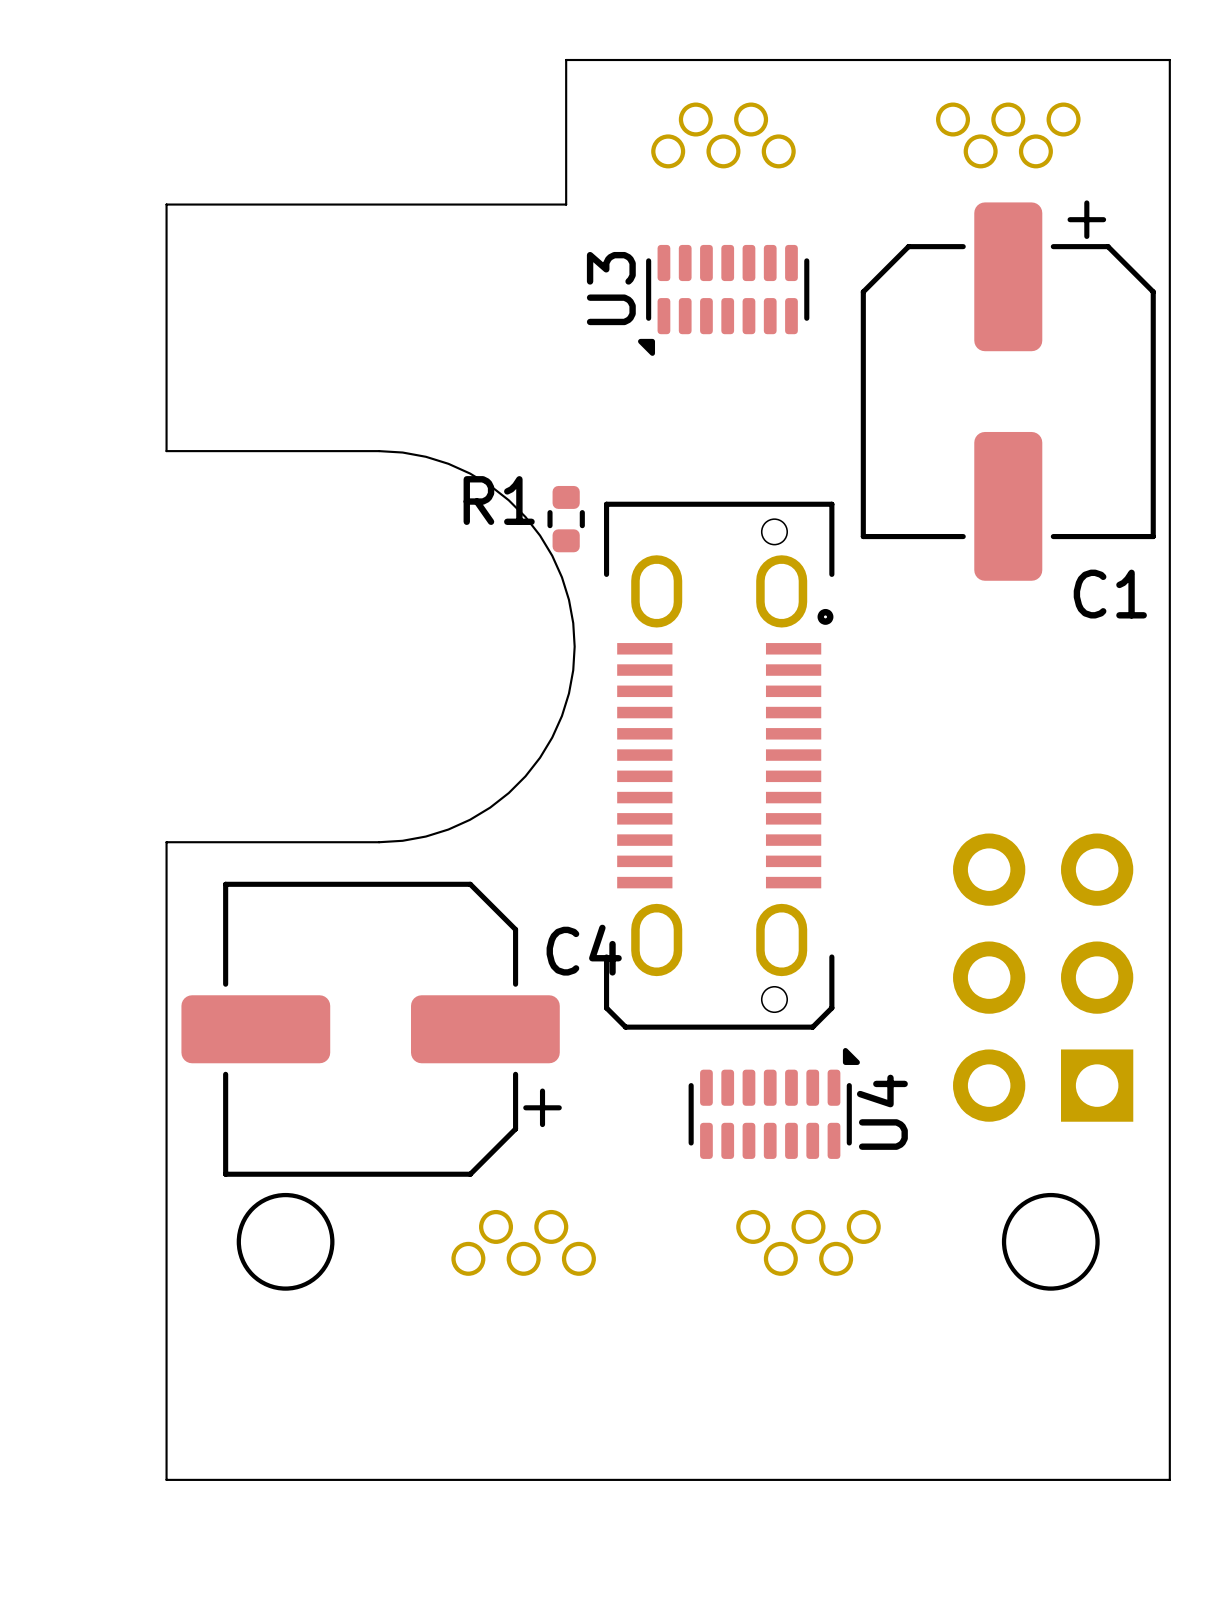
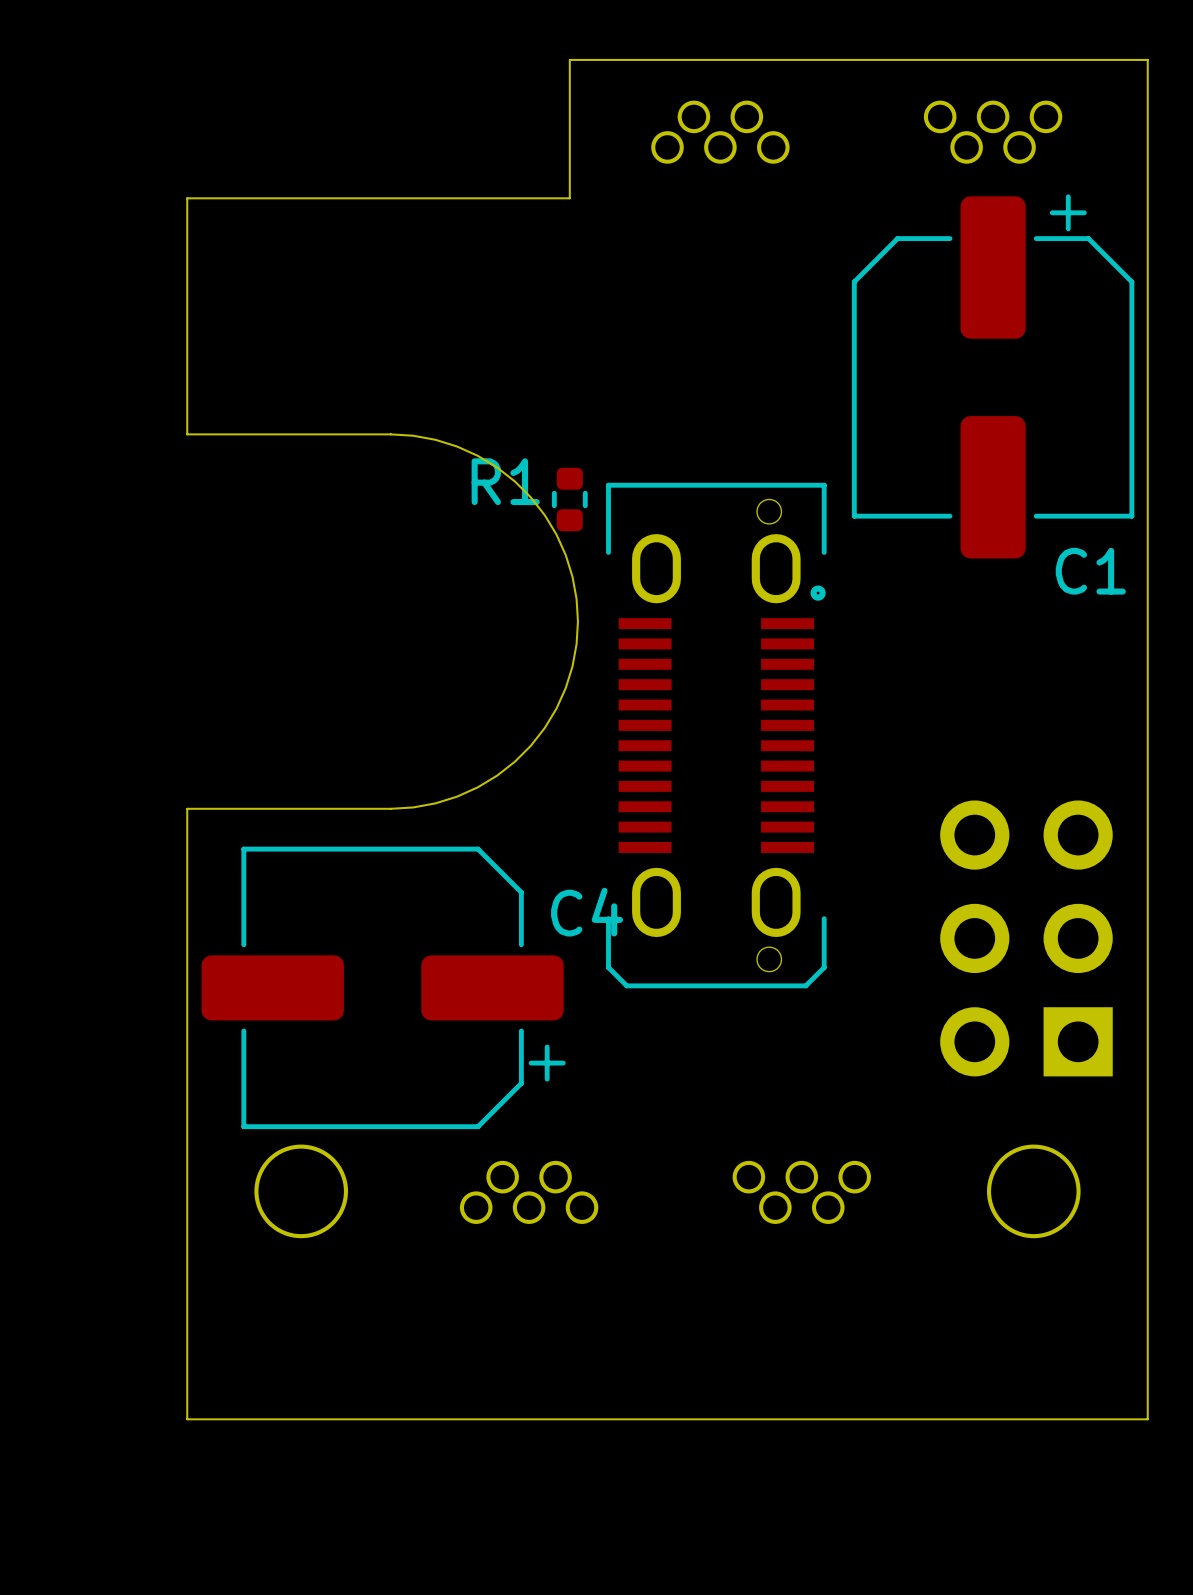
U3: (723, 300) -> none
U4: (774, 1103) -> none

